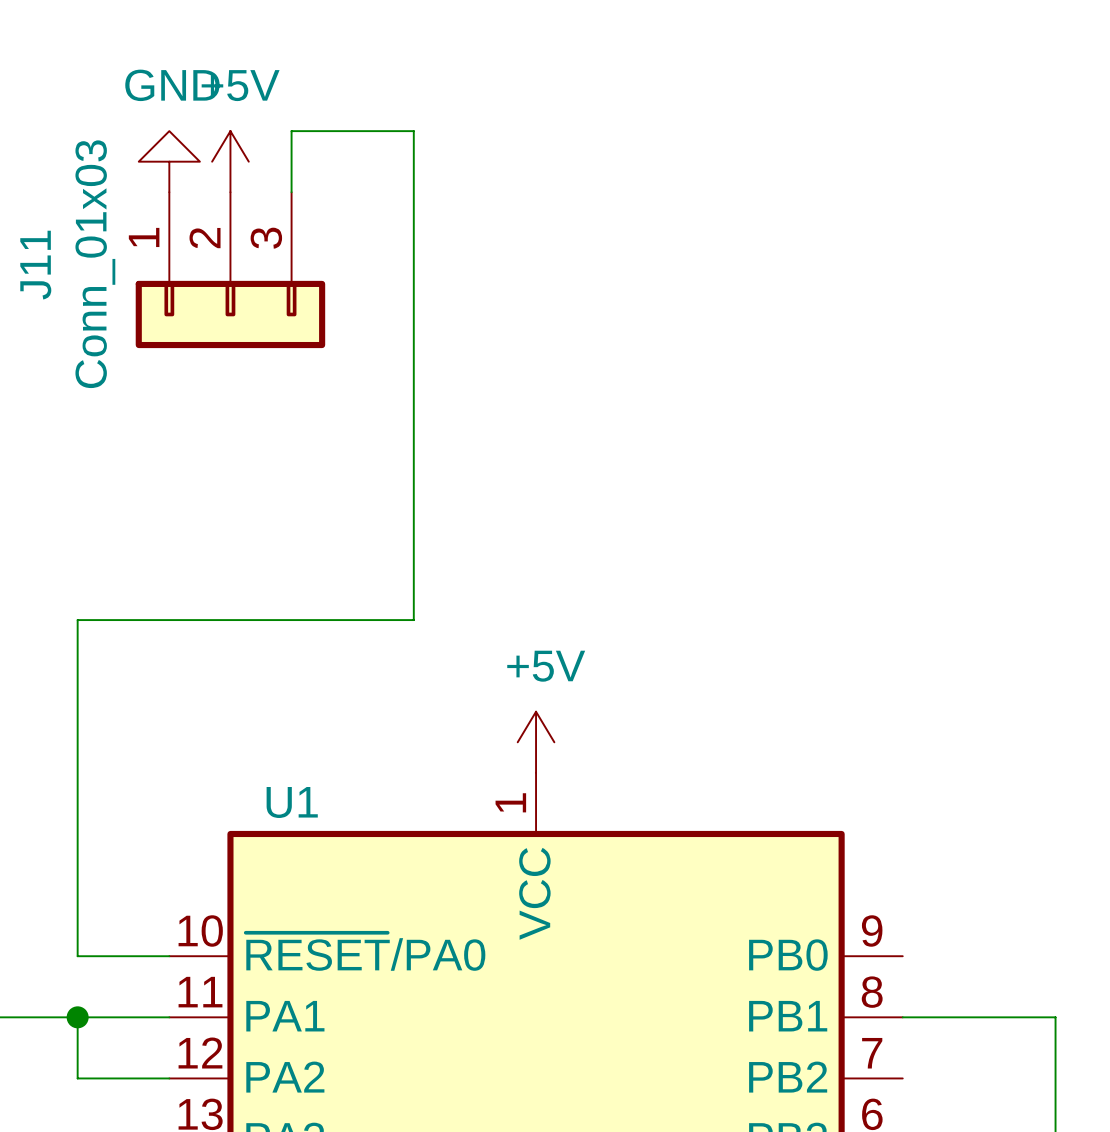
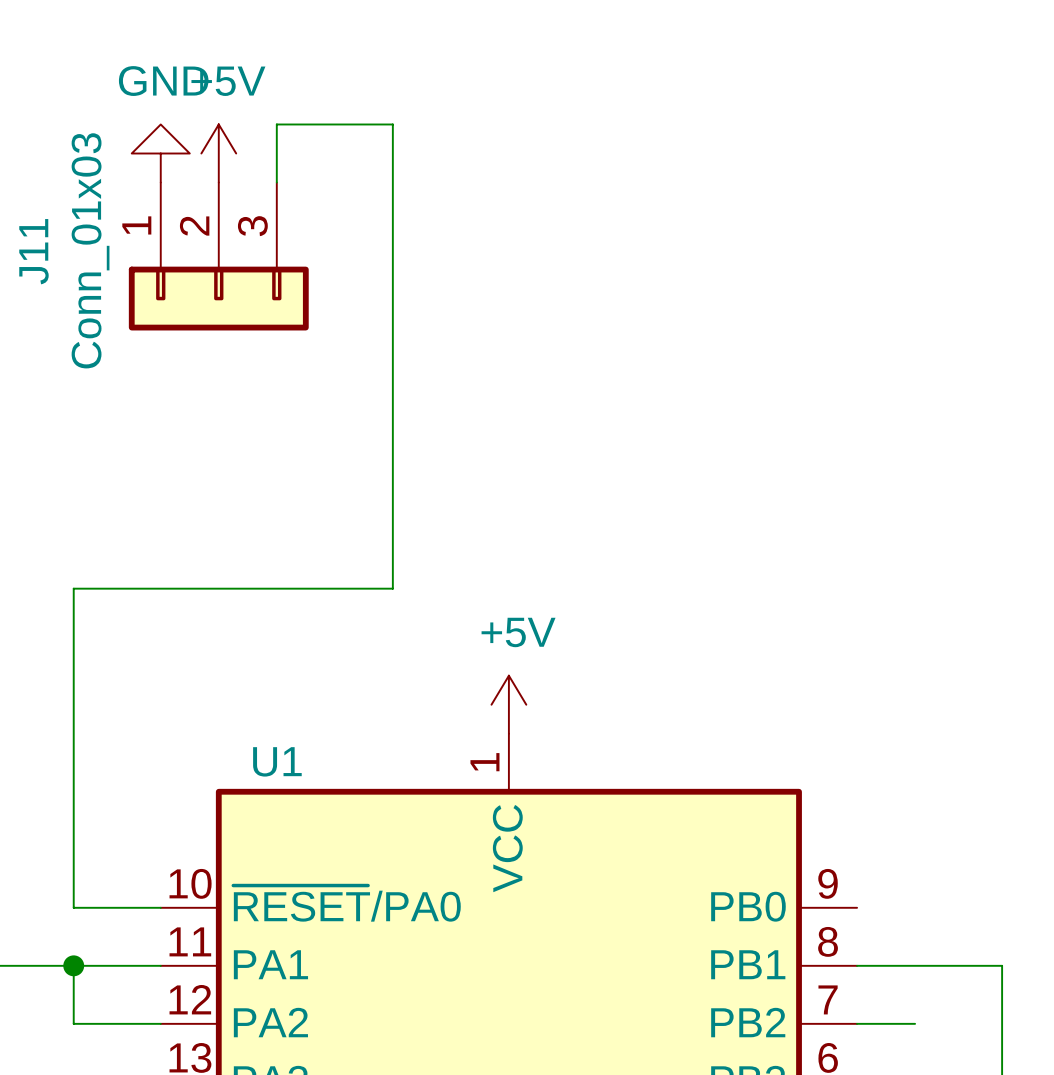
wire: none -> (857, 1023) (915, 1023)

